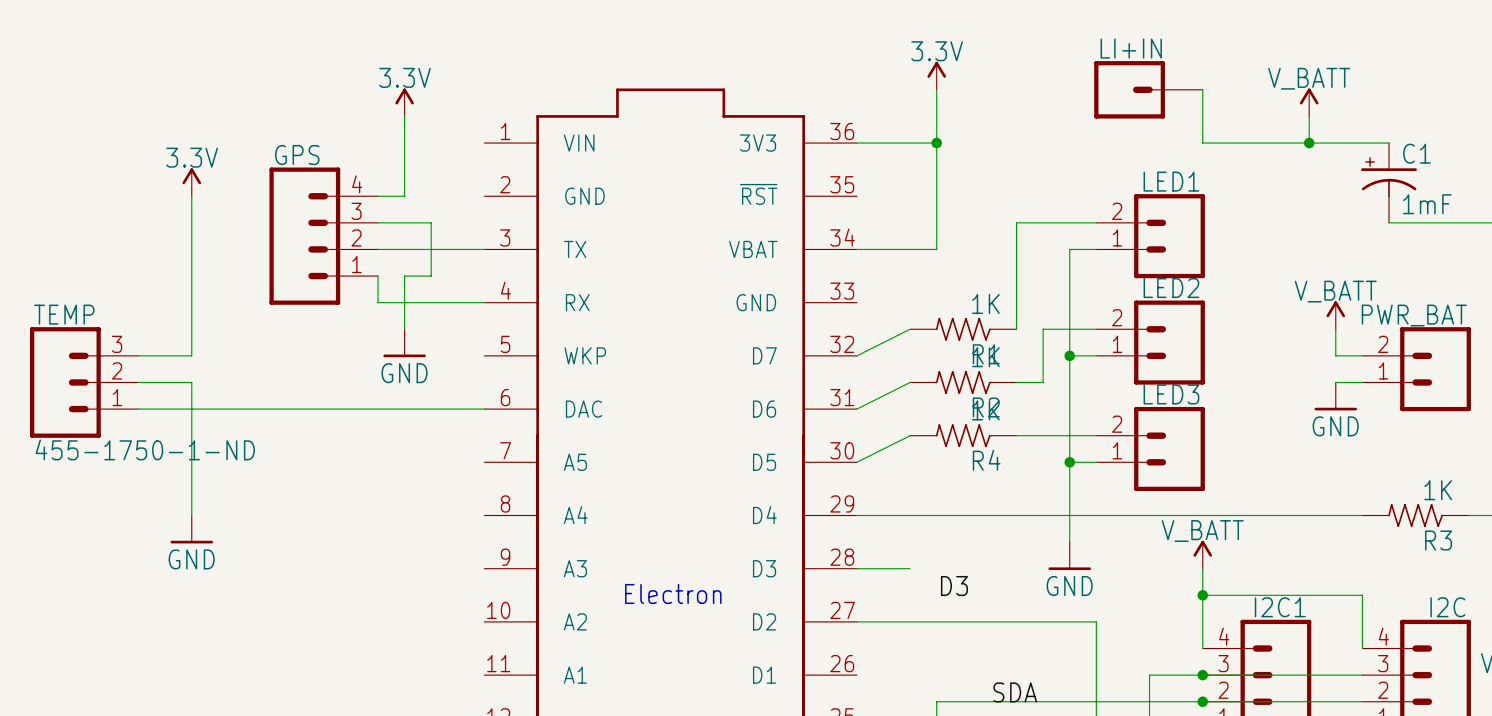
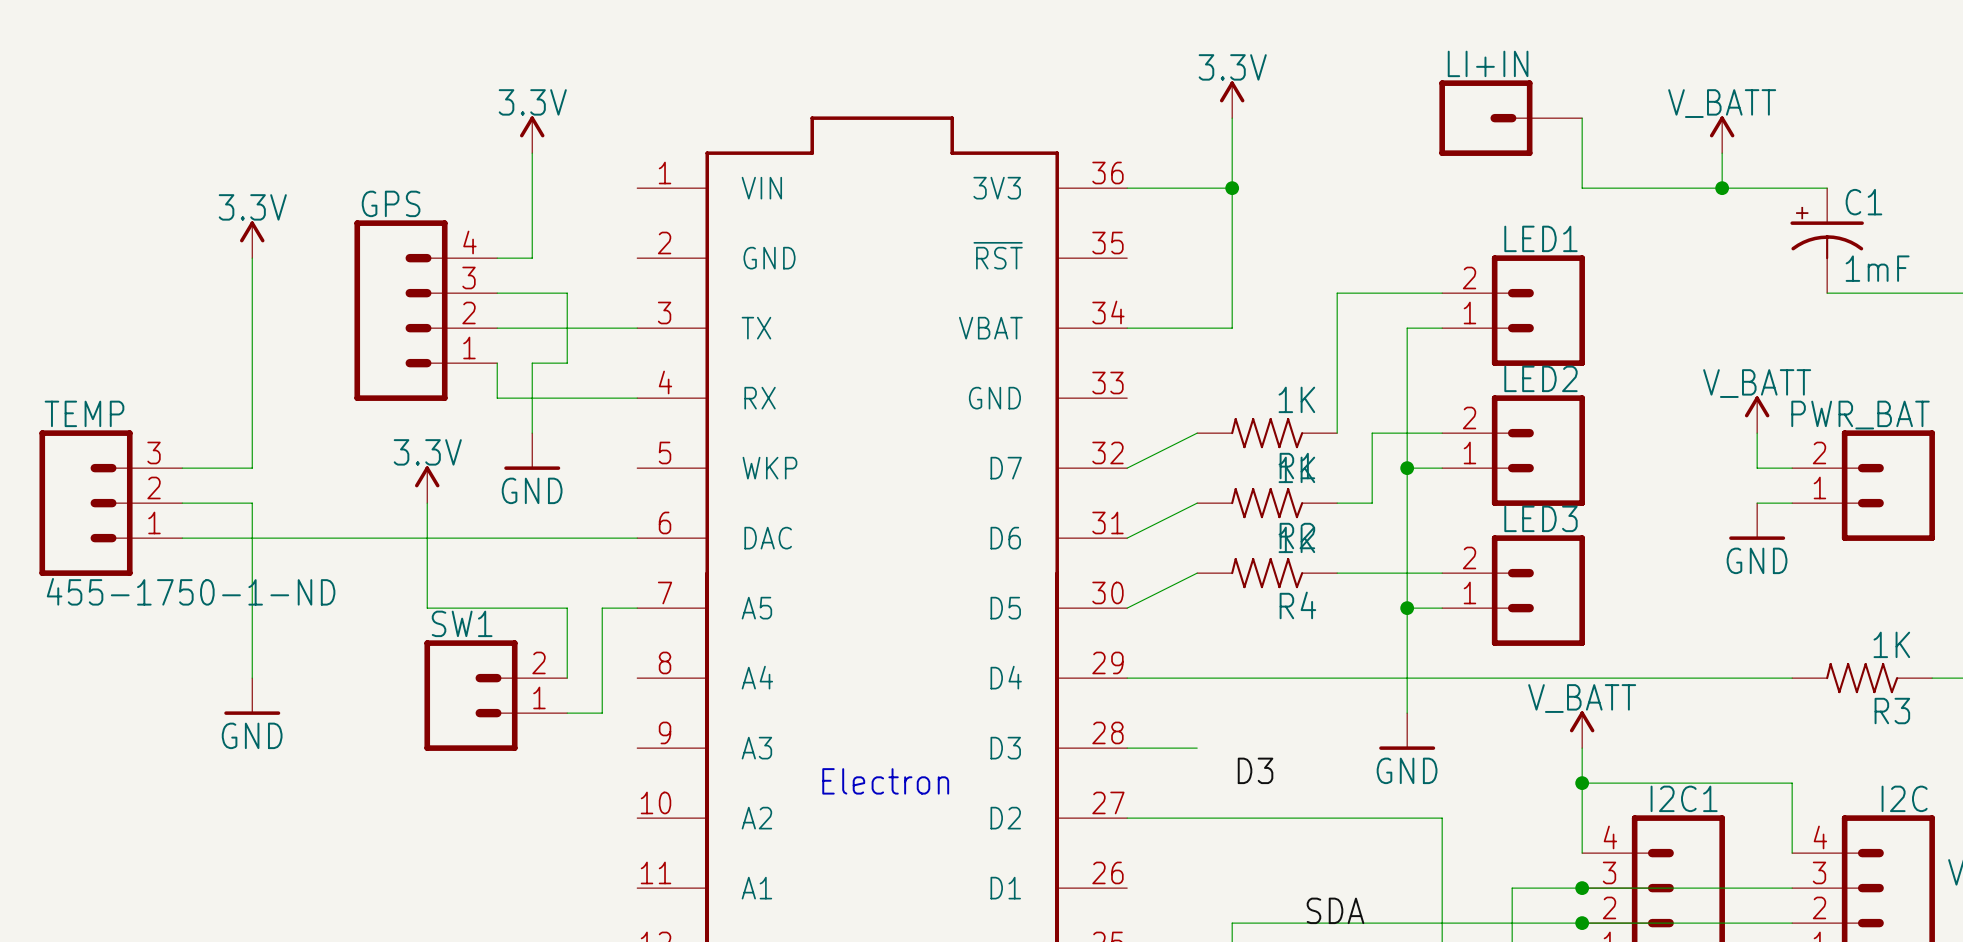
power symbol: none -> 3.3V (427, 484)
wire: none -> (427, 503) (427, 608) (567, 608) (567, 678)
wire: none -> (637, 608) (602, 608) (602, 713) (567, 713)
SW1: none -> (495, 695)

